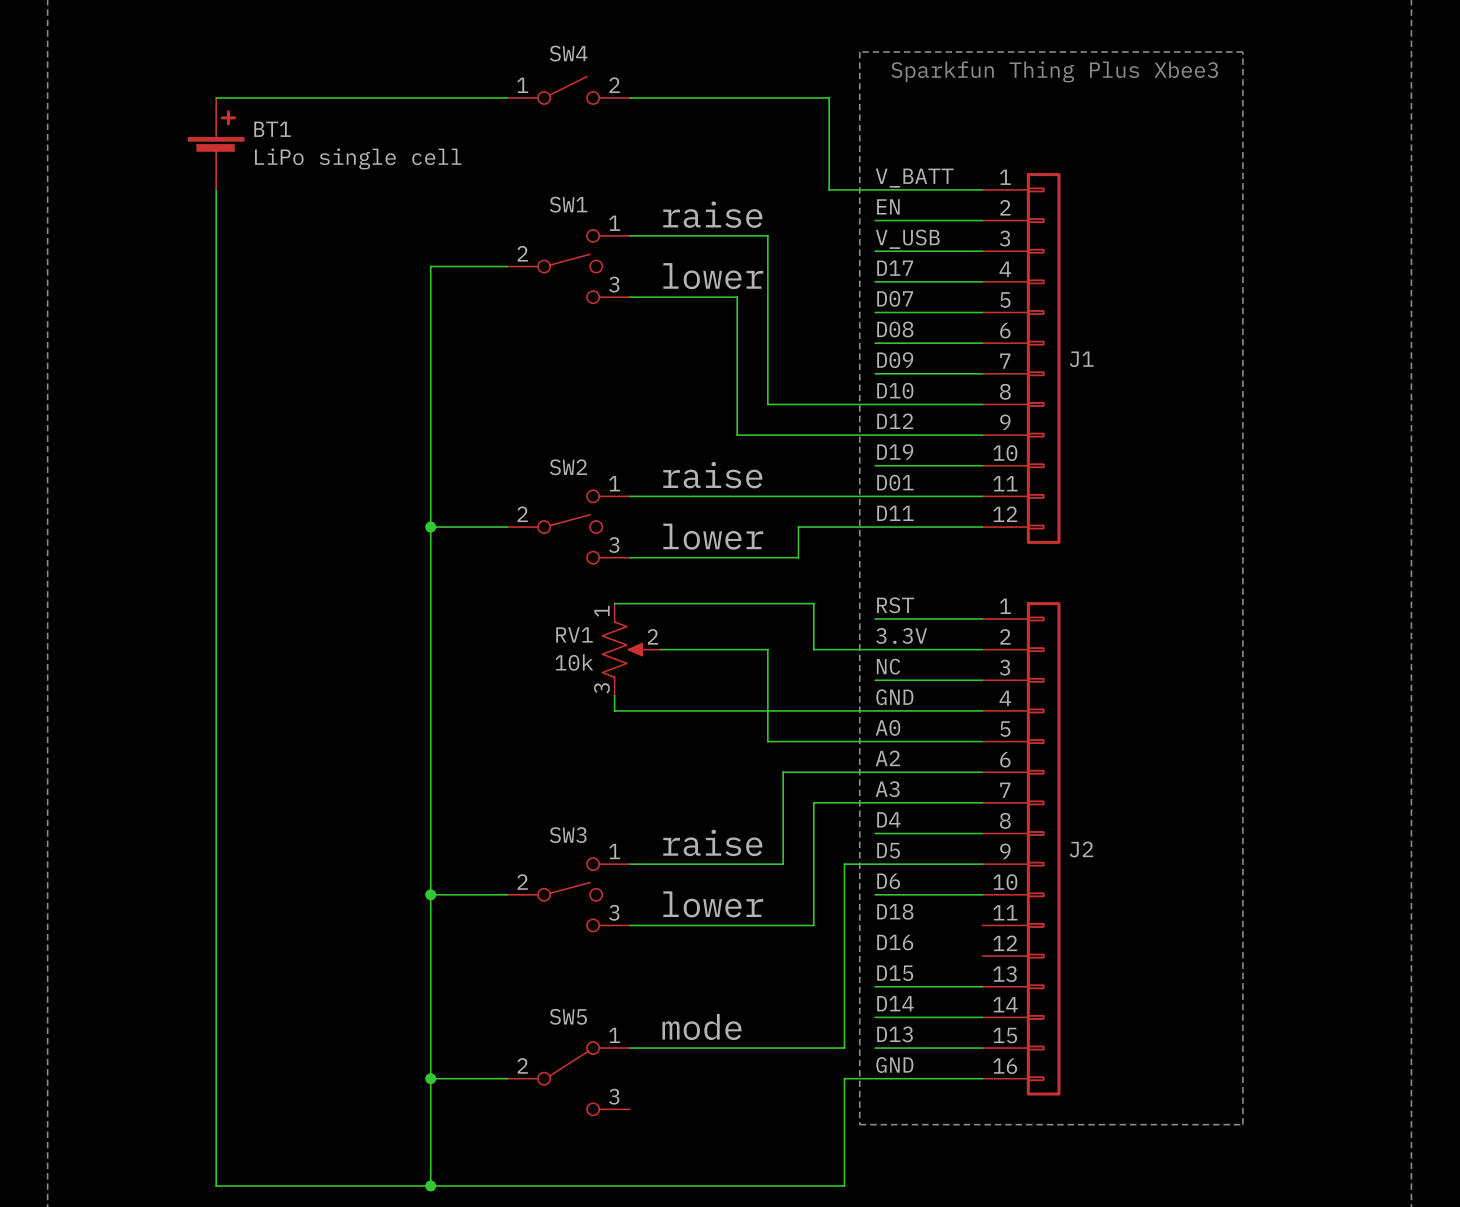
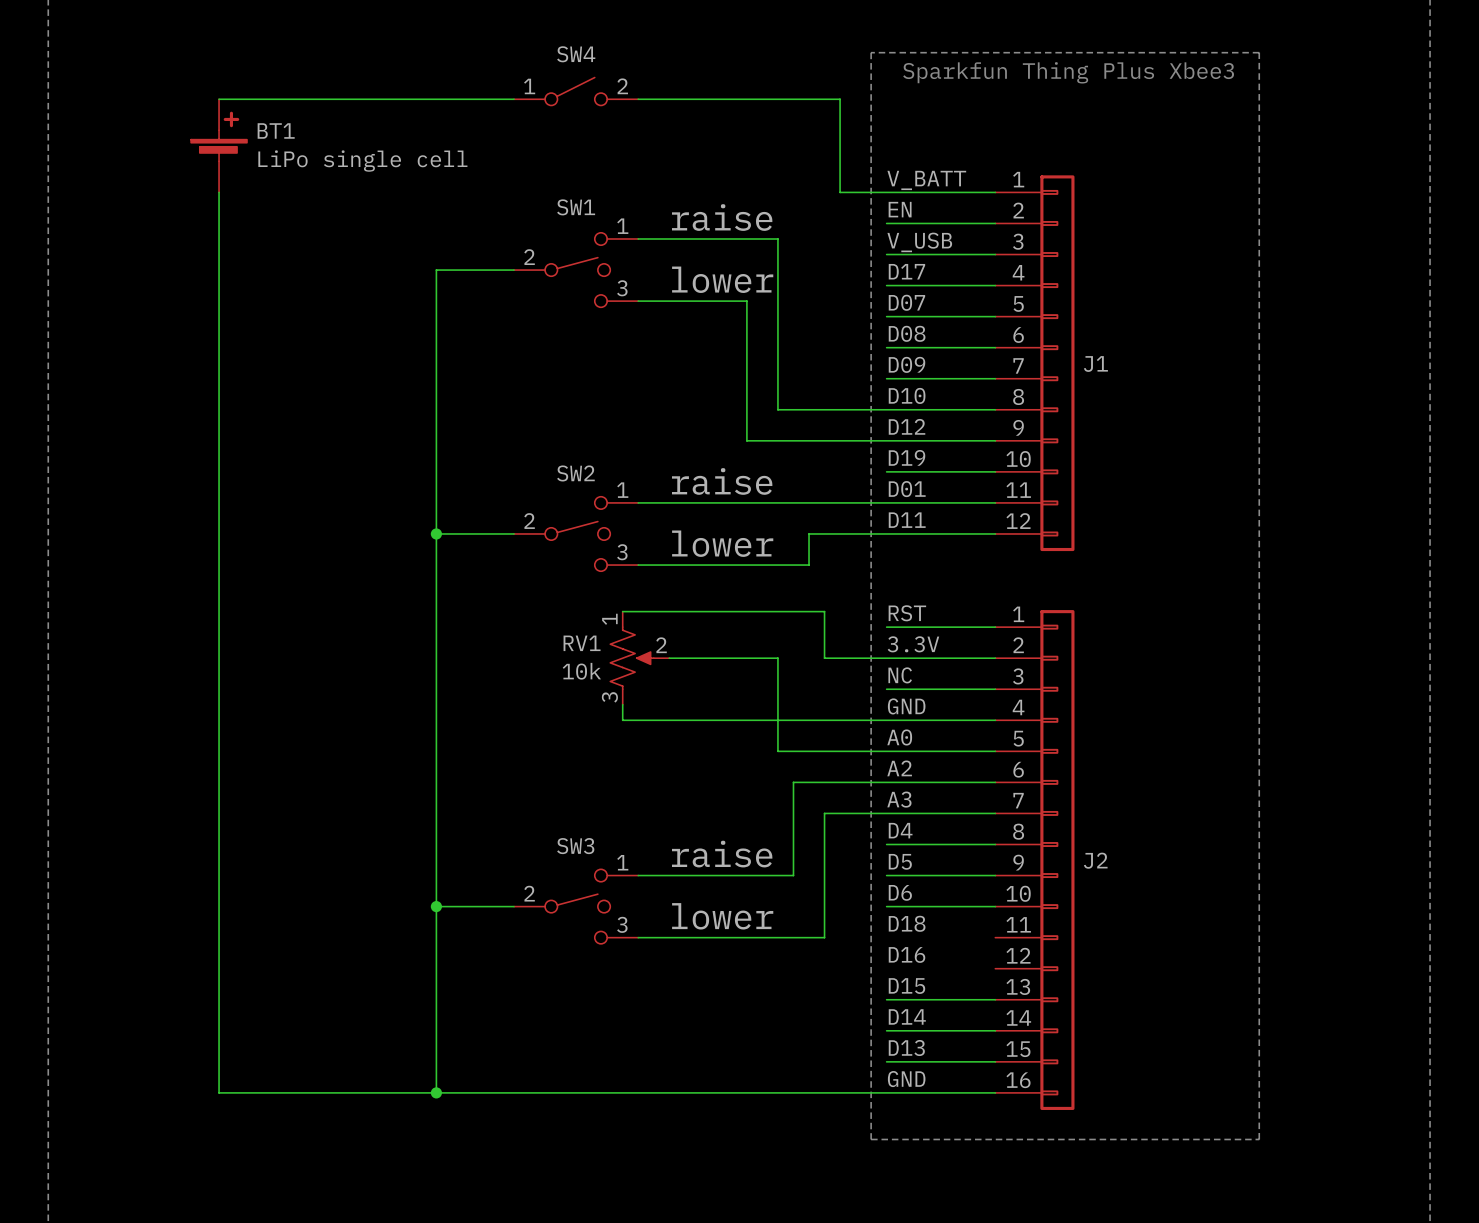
wire: (875, 864) (844, 864) (844, 1048) (629, 1048) -> none
label: mode (701, 1026) -> none
wire: (216, 1078) (216, 1185) (844, 1185) (844, 1078) -> (514, 1092) (855, 1092)
wire: (430, 1078) (430, 1185) -> (436, 1092) (219, 1092)
SW5: (568, 1078) -> none
junction: (430, 1185) -> none

